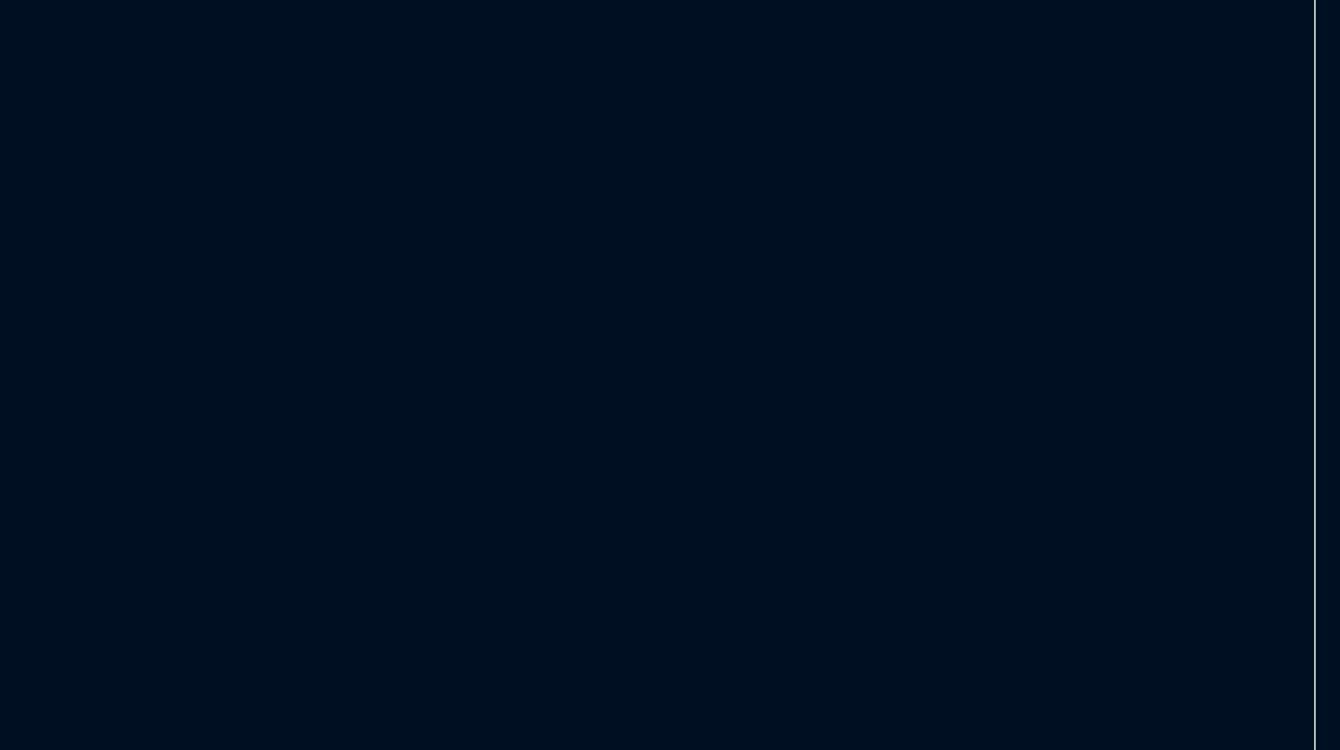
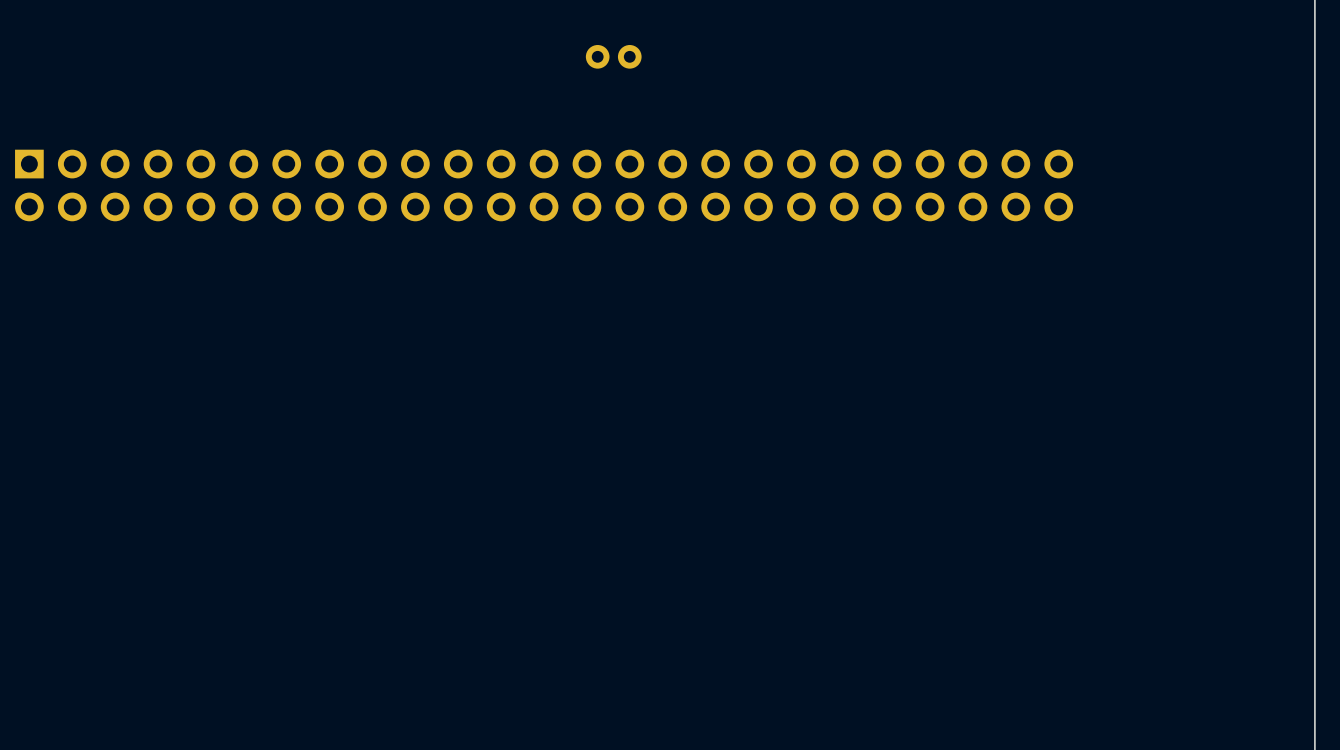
part: none -> (613, 56)
part: none -> (544, 185)

